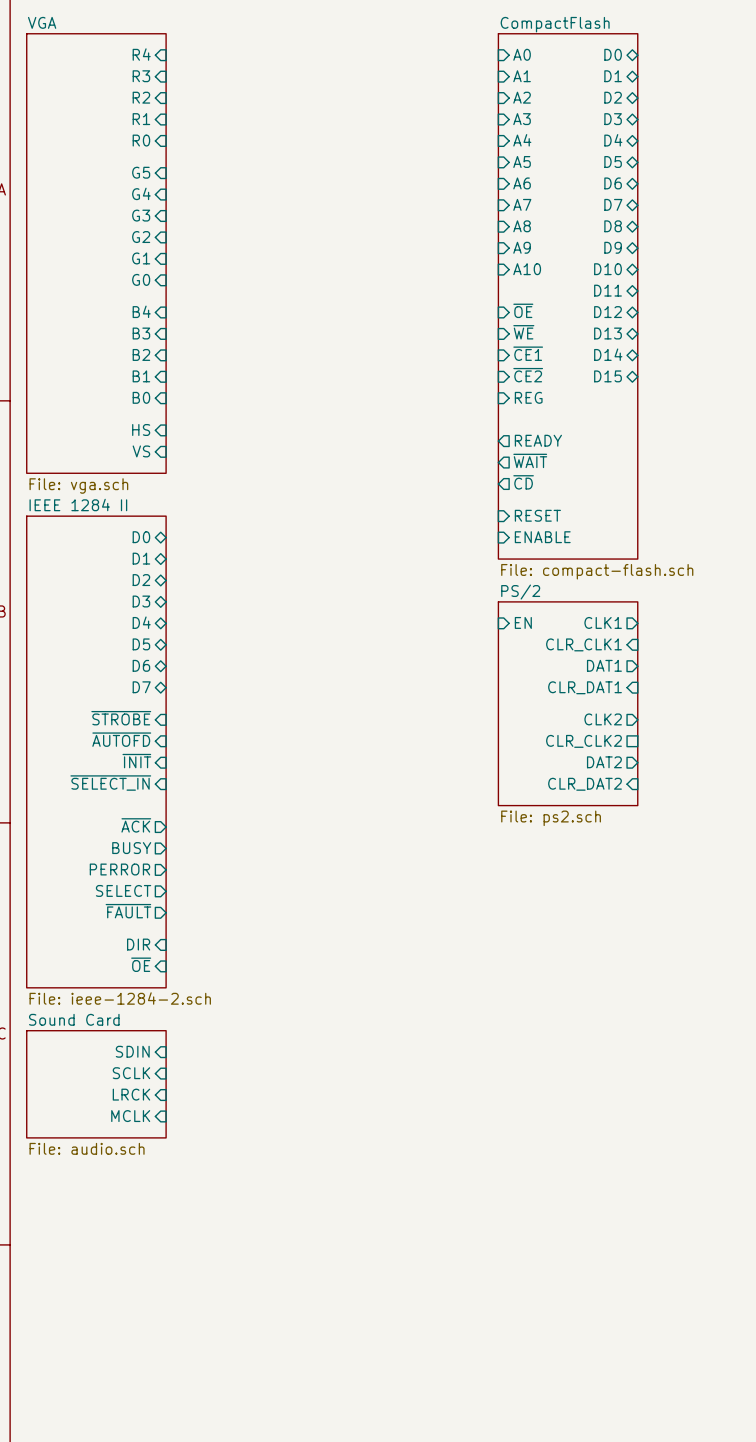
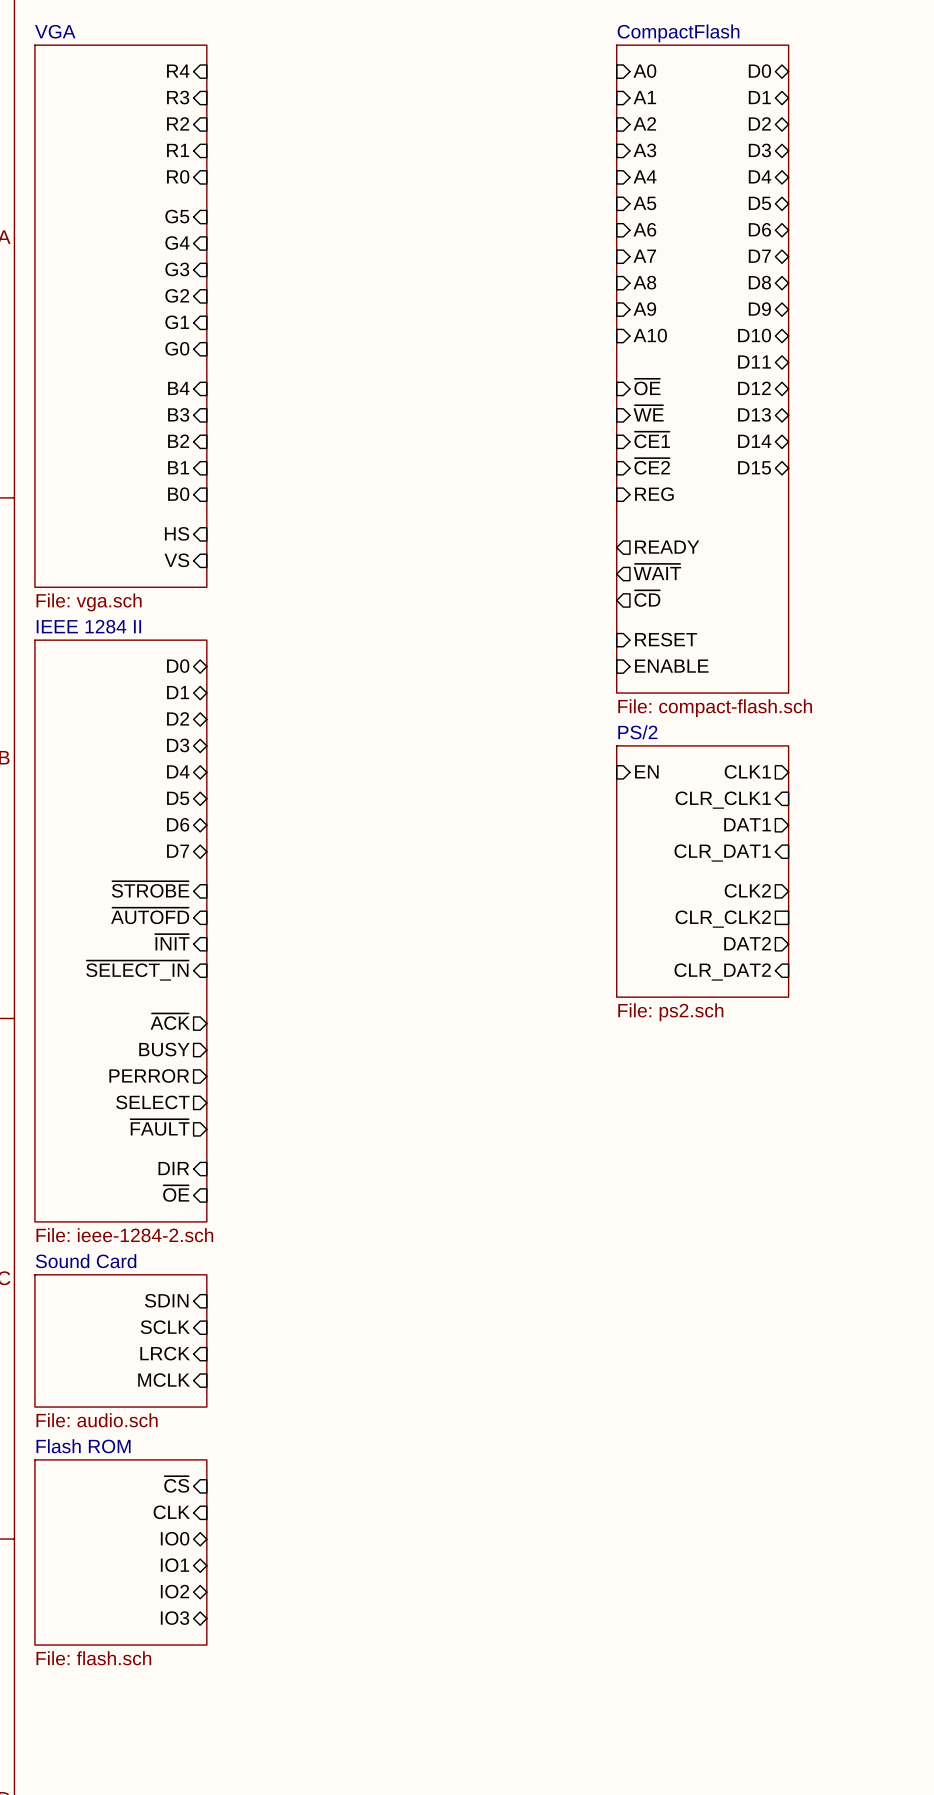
sheet pin: none -> ~{CS} (176, 1484)
sheet pin: none -> CLK (171, 1512)
sheet pin: none -> IO0 (175, 1538)
sheet Flash ROM: none -> File: flash.sch (120, 1552)
sheet pin: none -> IO1 (174, 1565)
sheet pin: none -> IO2 (174, 1591)
sheet pin: none -> IO3 (175, 1618)

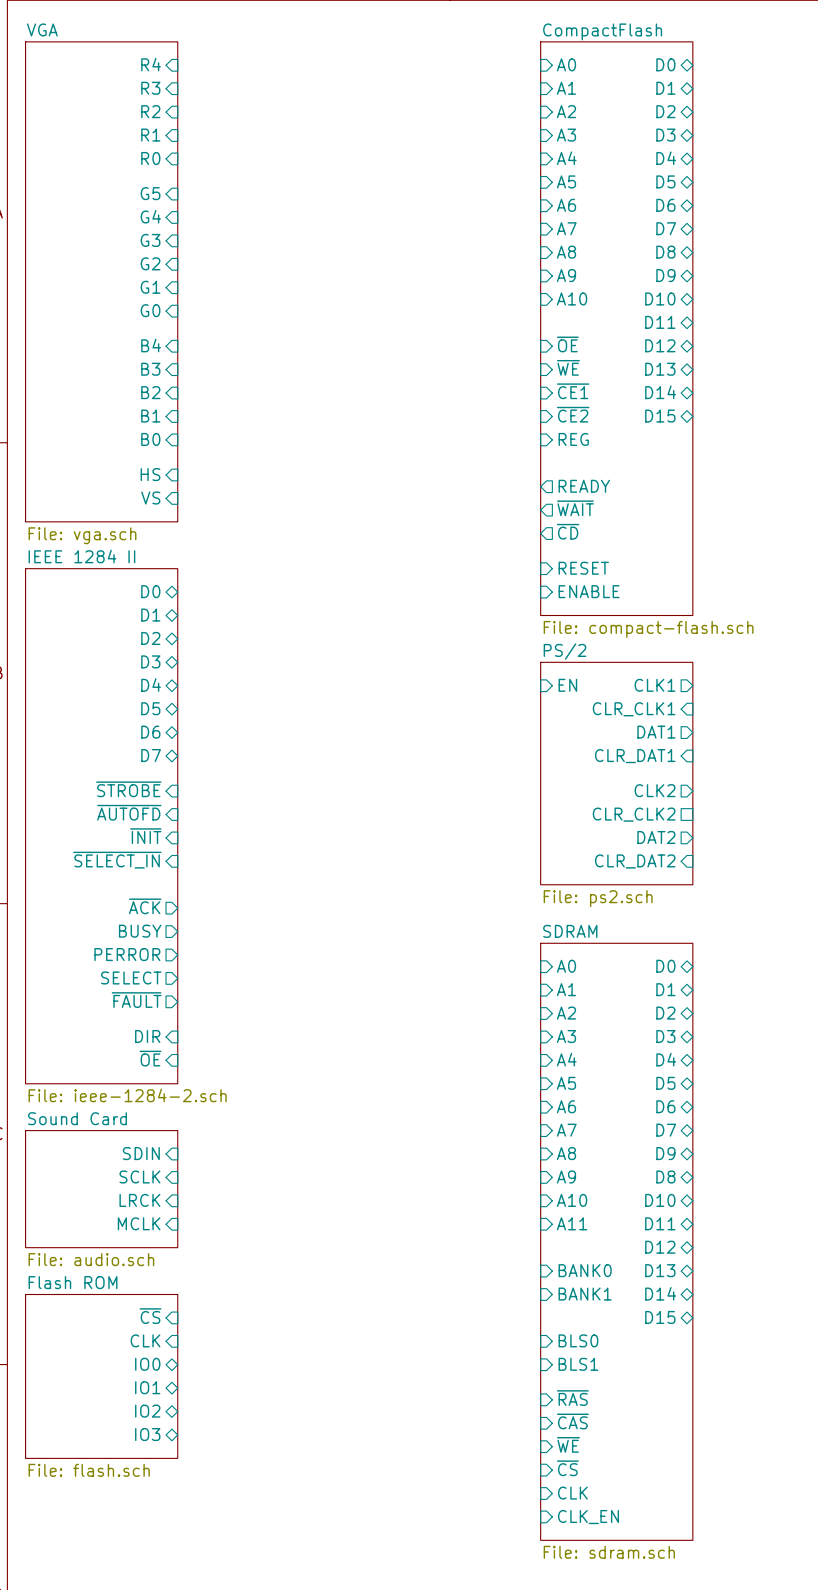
sheet pin: none -> A0 (566, 966)
sheet pin: none -> D0 (665, 966)
sheet pin: none -> A1 (566, 989)
sheet pin: none -> D1 (665, 989)
sheet pin: none -> A2 (566, 1013)
sheet pin: none -> D2 (665, 1013)
sheet pin: none -> A3 (566, 1036)
sheet pin: none -> D3 (665, 1036)
sheet pin: none -> A4 (566, 1059)
sheet pin: none -> D4 (666, 1059)
sheet pin: none -> A5 (566, 1083)
sheet pin: none -> D5 (665, 1083)
sheet pin: none -> A6 (566, 1106)
sheet pin: none -> D6 (665, 1106)
sheet pin: none -> A7 (566, 1130)
sheet pin: none -> D7 (666, 1130)
sheet pin: none -> A8 (566, 1153)
sheet pin: none -> D9 (665, 1153)
sheet pin: none -> A9 (566, 1176)
sheet pin: none -> D8 (665, 1176)
sheet pin: none -> A10 (572, 1200)
sheet pin: none -> D10 (660, 1200)
sheet pin: none -> A11 (572, 1223)
sheet pin: none -> D11 (660, 1223)
sheet SDRAM: none -> File: sdram.sch (616, 1241)
sheet pin: none -> D12 (660, 1247)
sheet pin: none -> BANK0 (585, 1270)
sheet pin: none -> D13 (660, 1270)
sheet pin: none -> BANK1 (585, 1294)
sheet pin: none -> D14 (660, 1293)
sheet pin: none -> D15 (660, 1317)
sheet pin: none -> BLS0 (578, 1340)
sheet pin: none -> BLS1 (578, 1364)
sheet pin: none -> ~{RAS} (572, 1398)
sheet pin: none -> ~{CAS} (572, 1421)
sheet pin: none -> ~{WE} (568, 1444)
sheet pin: none -> ~{CS} (567, 1468)
sheet pin: none -> CLK (572, 1493)
sheet pin: none -> CLK_EN (588, 1517)

